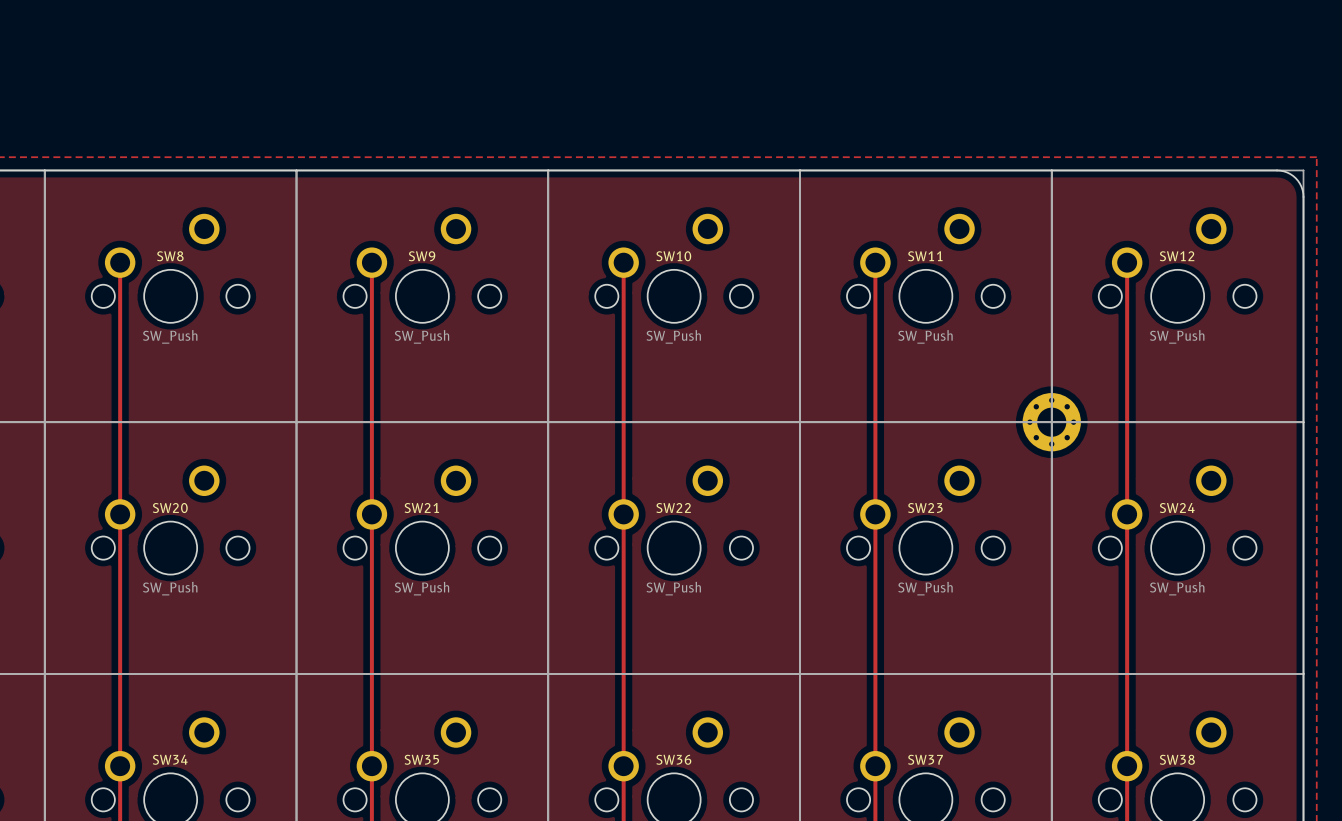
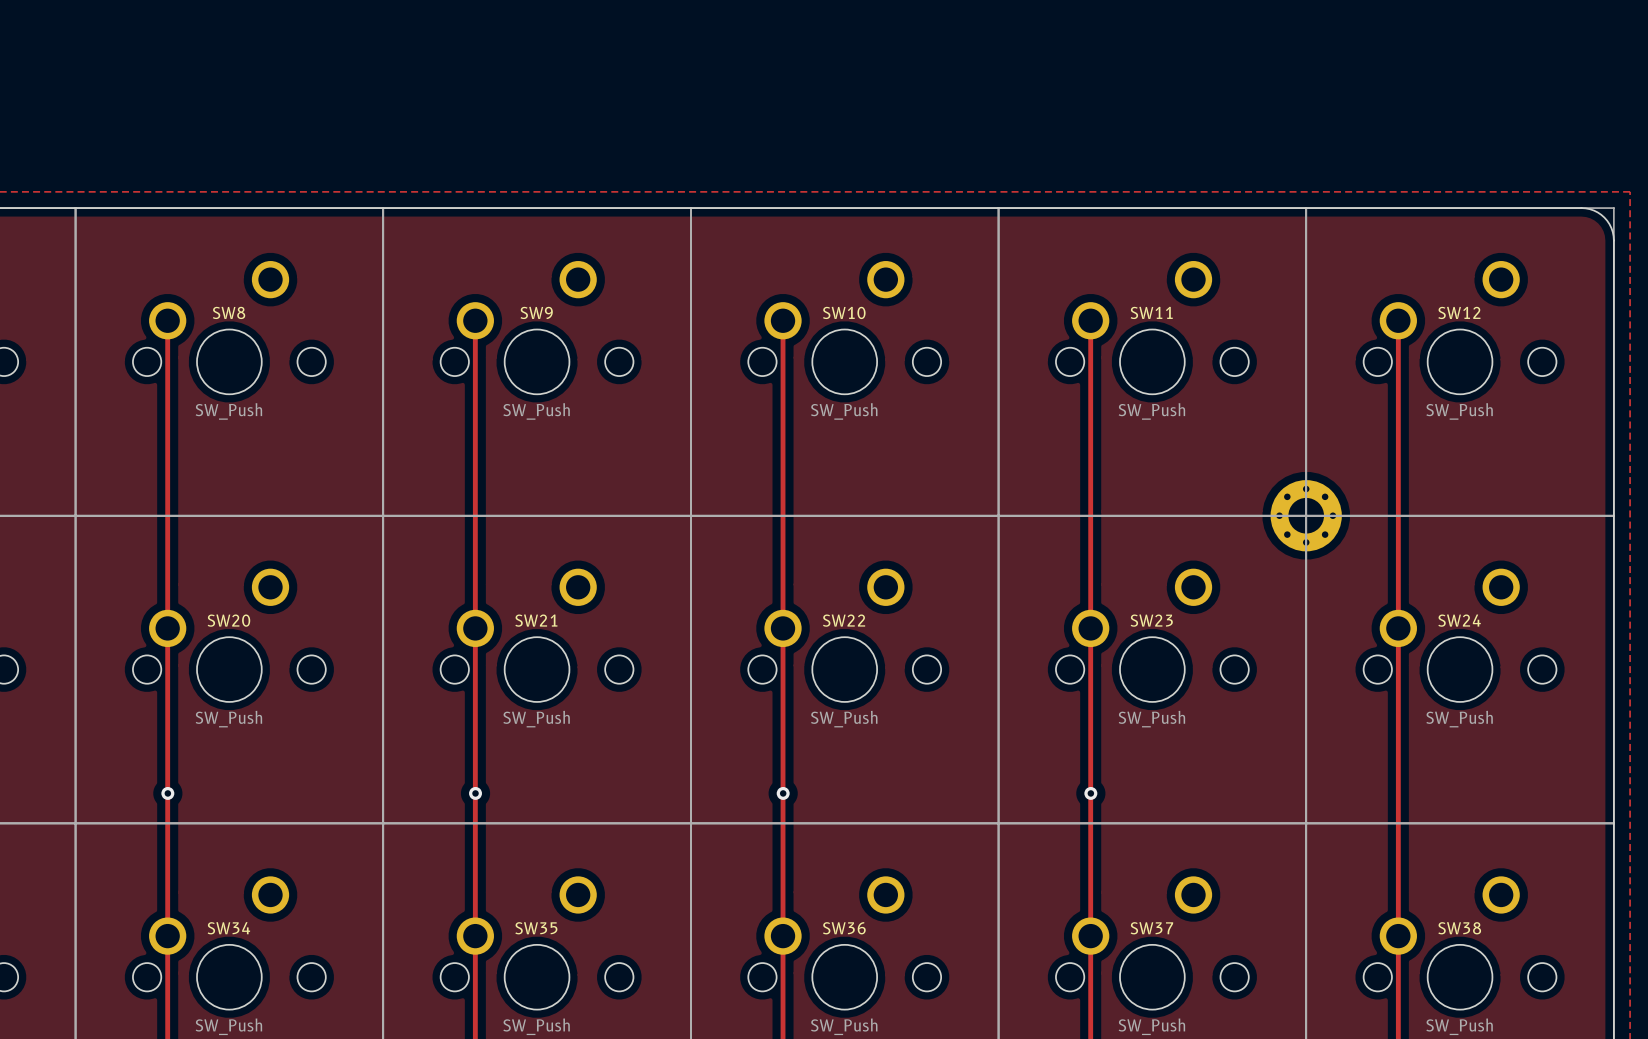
via: none -> (167, 793)
via: none -> (475, 793)
via: none -> (783, 793)
via: none -> (1090, 793)

